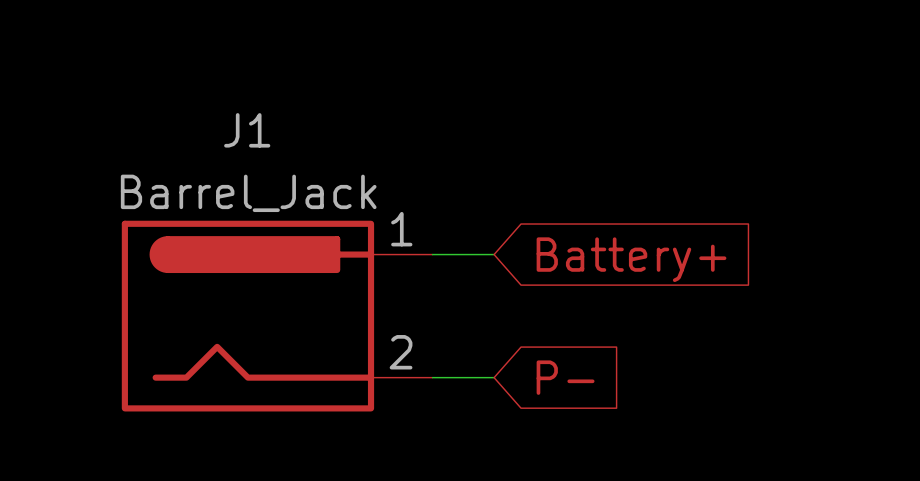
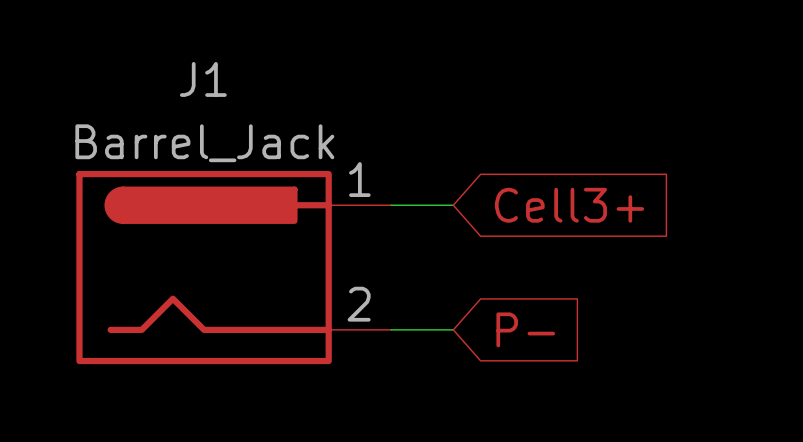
global label: Battery+ (631, 259) -> Cell3+ (569, 205)

